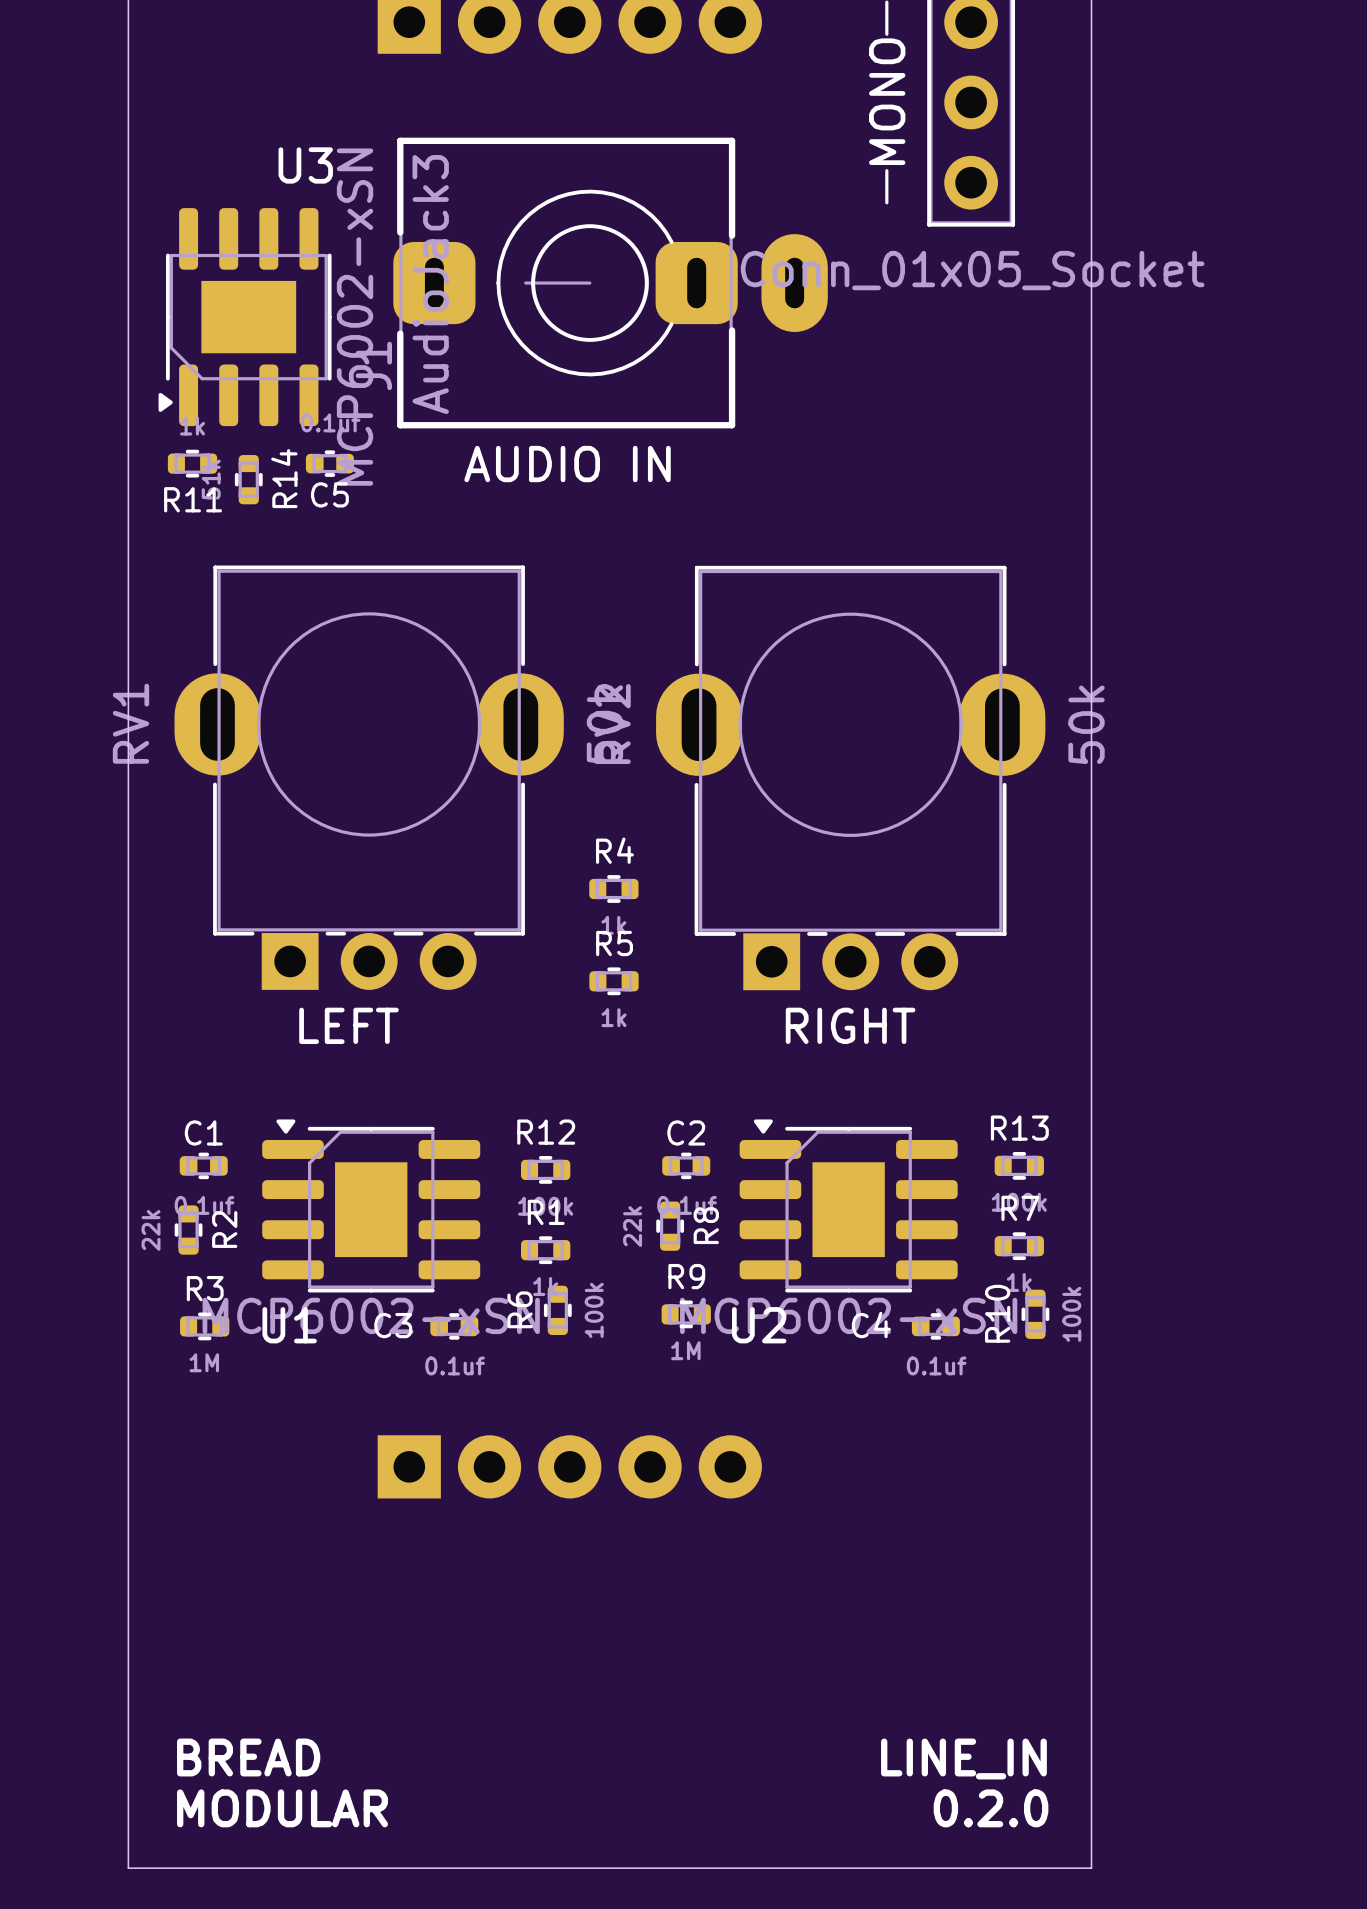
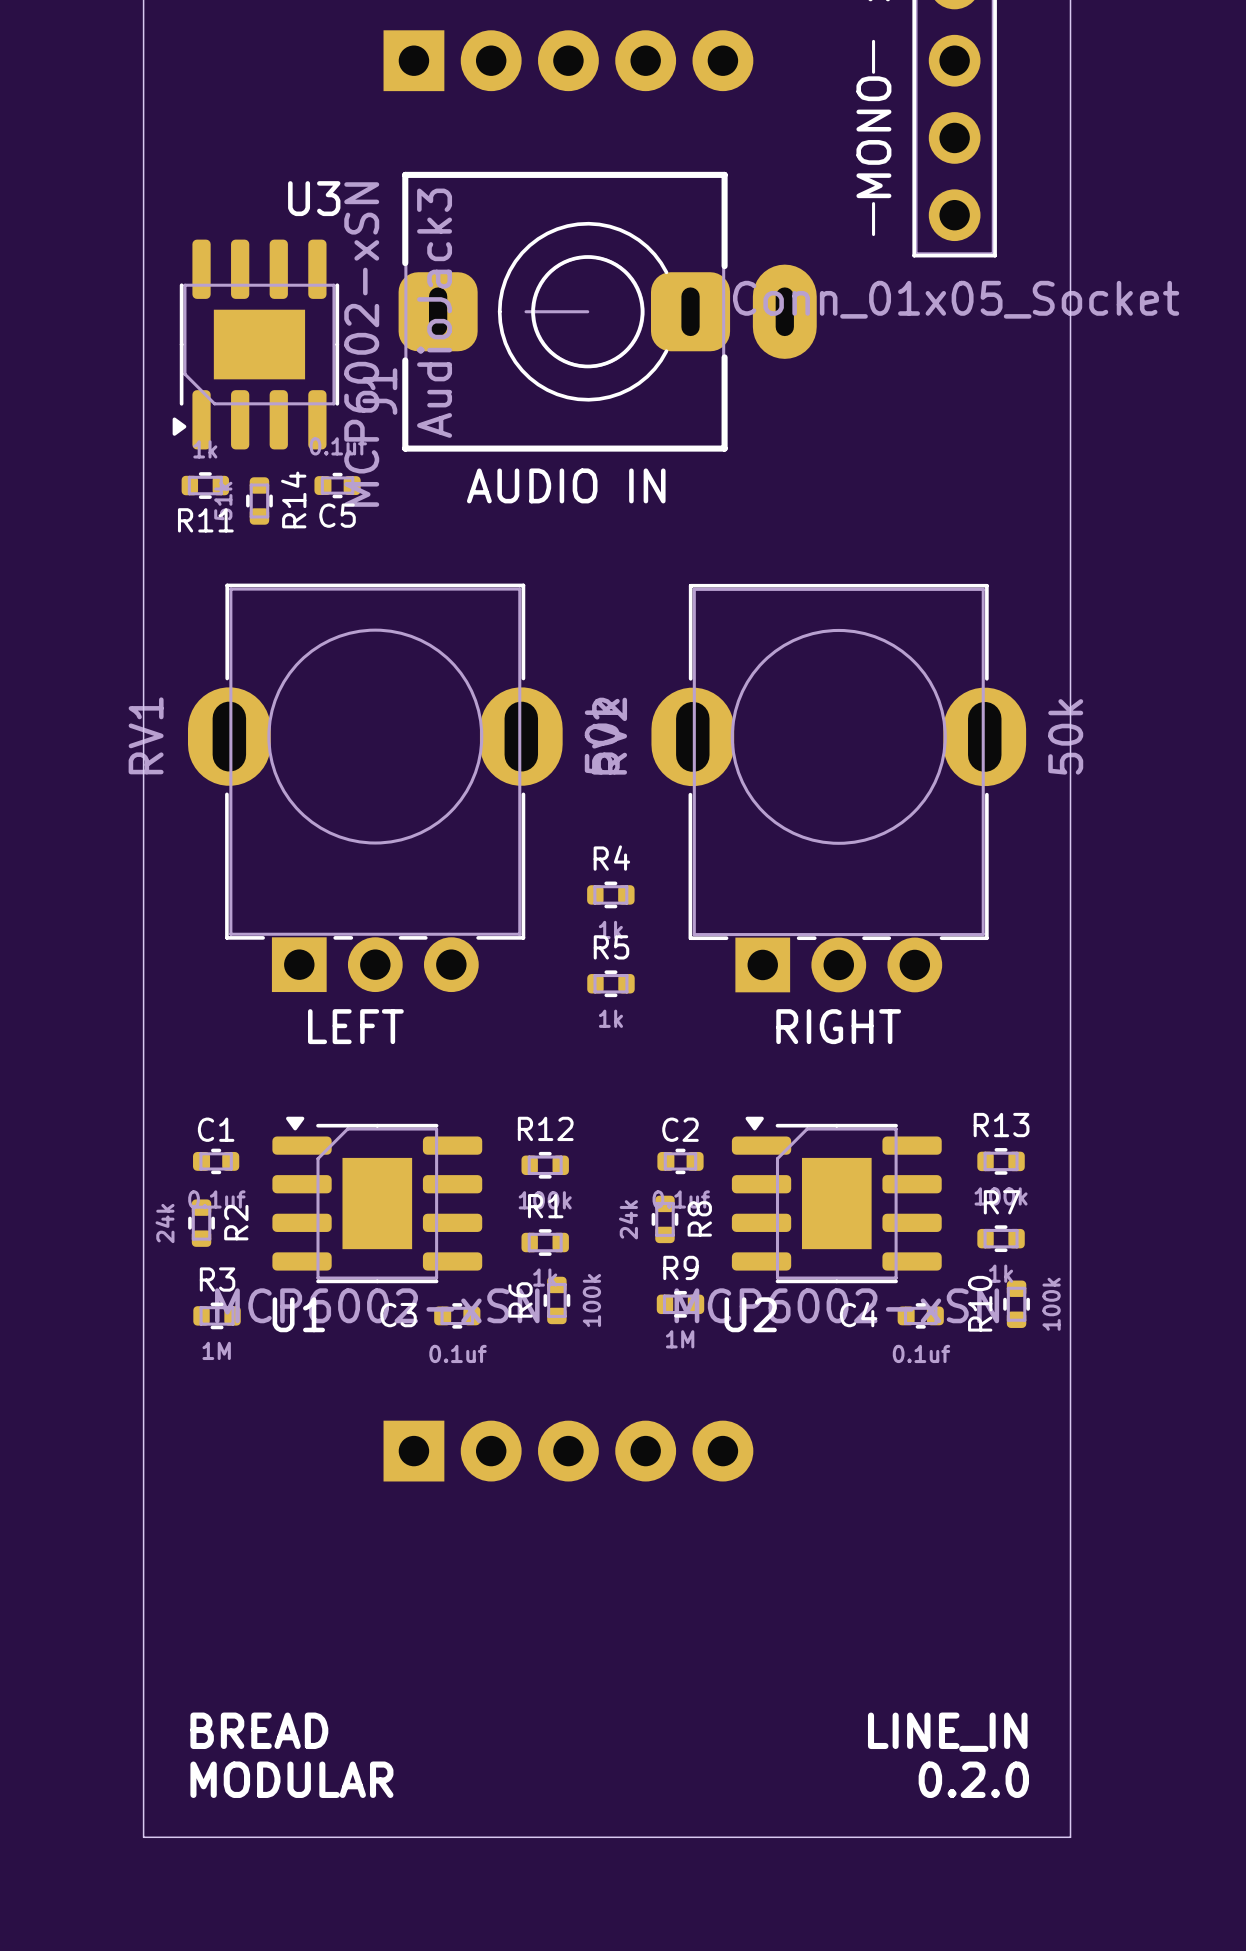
R8 value: 22k (632, 1226) -> 24k (628, 1219)
R2 value: 22k (151, 1230) -> 24k (165, 1223)

